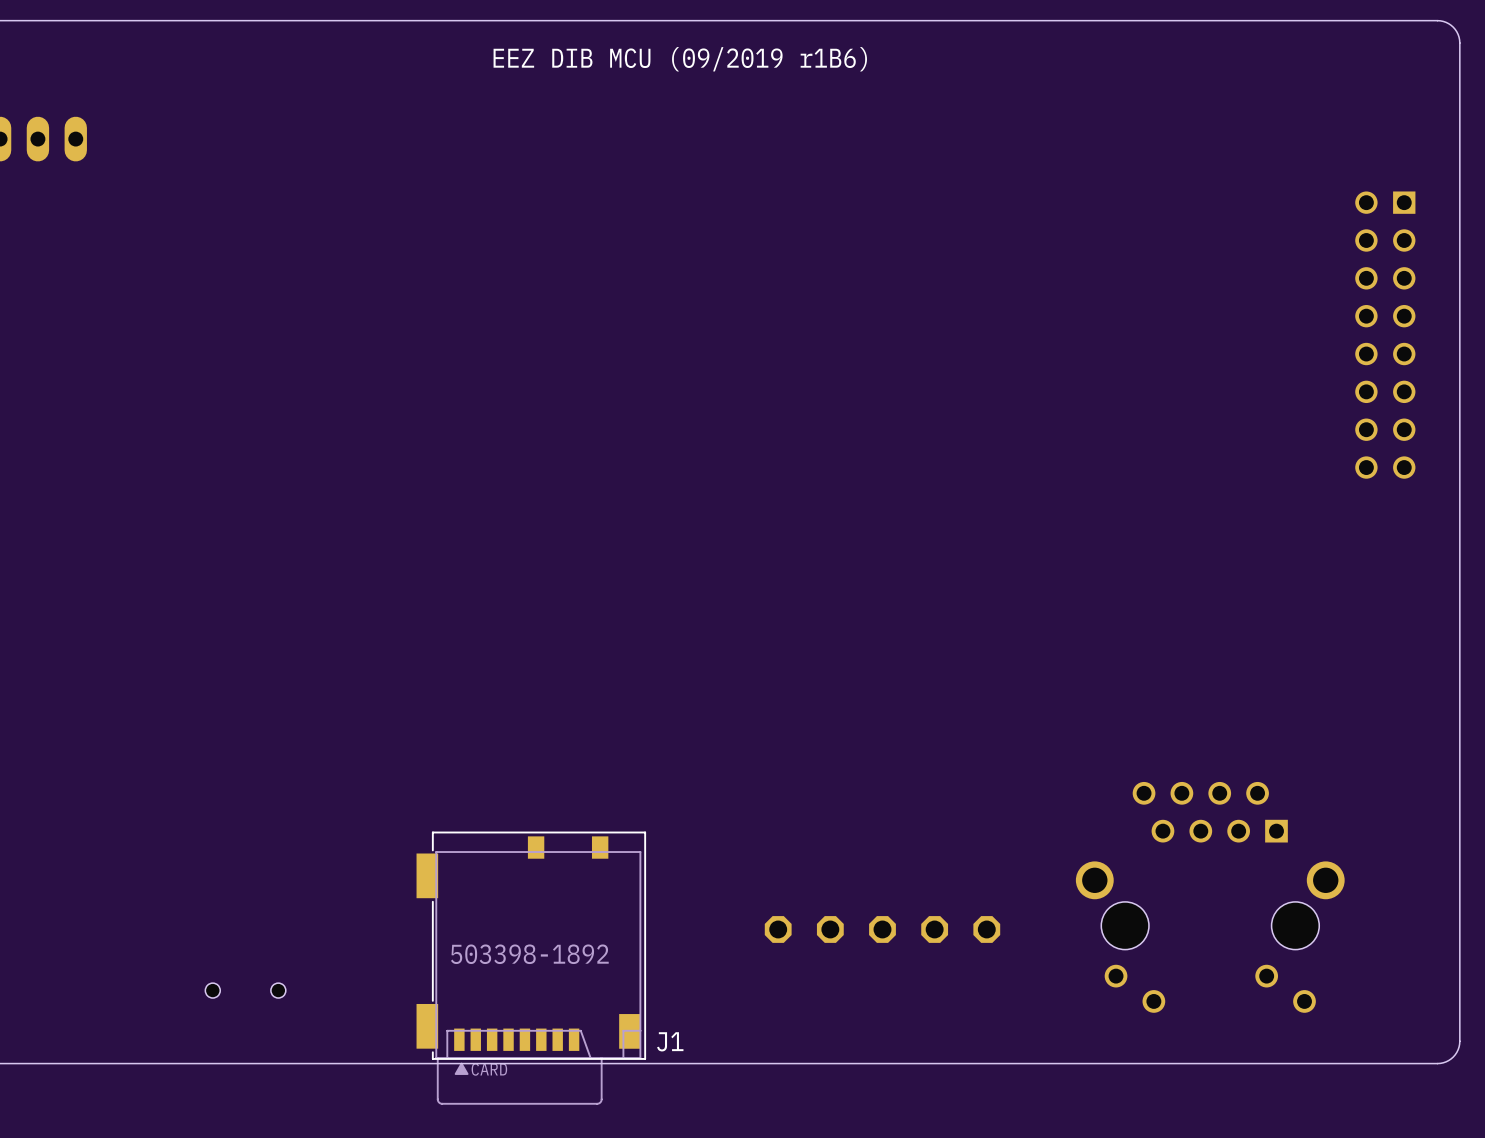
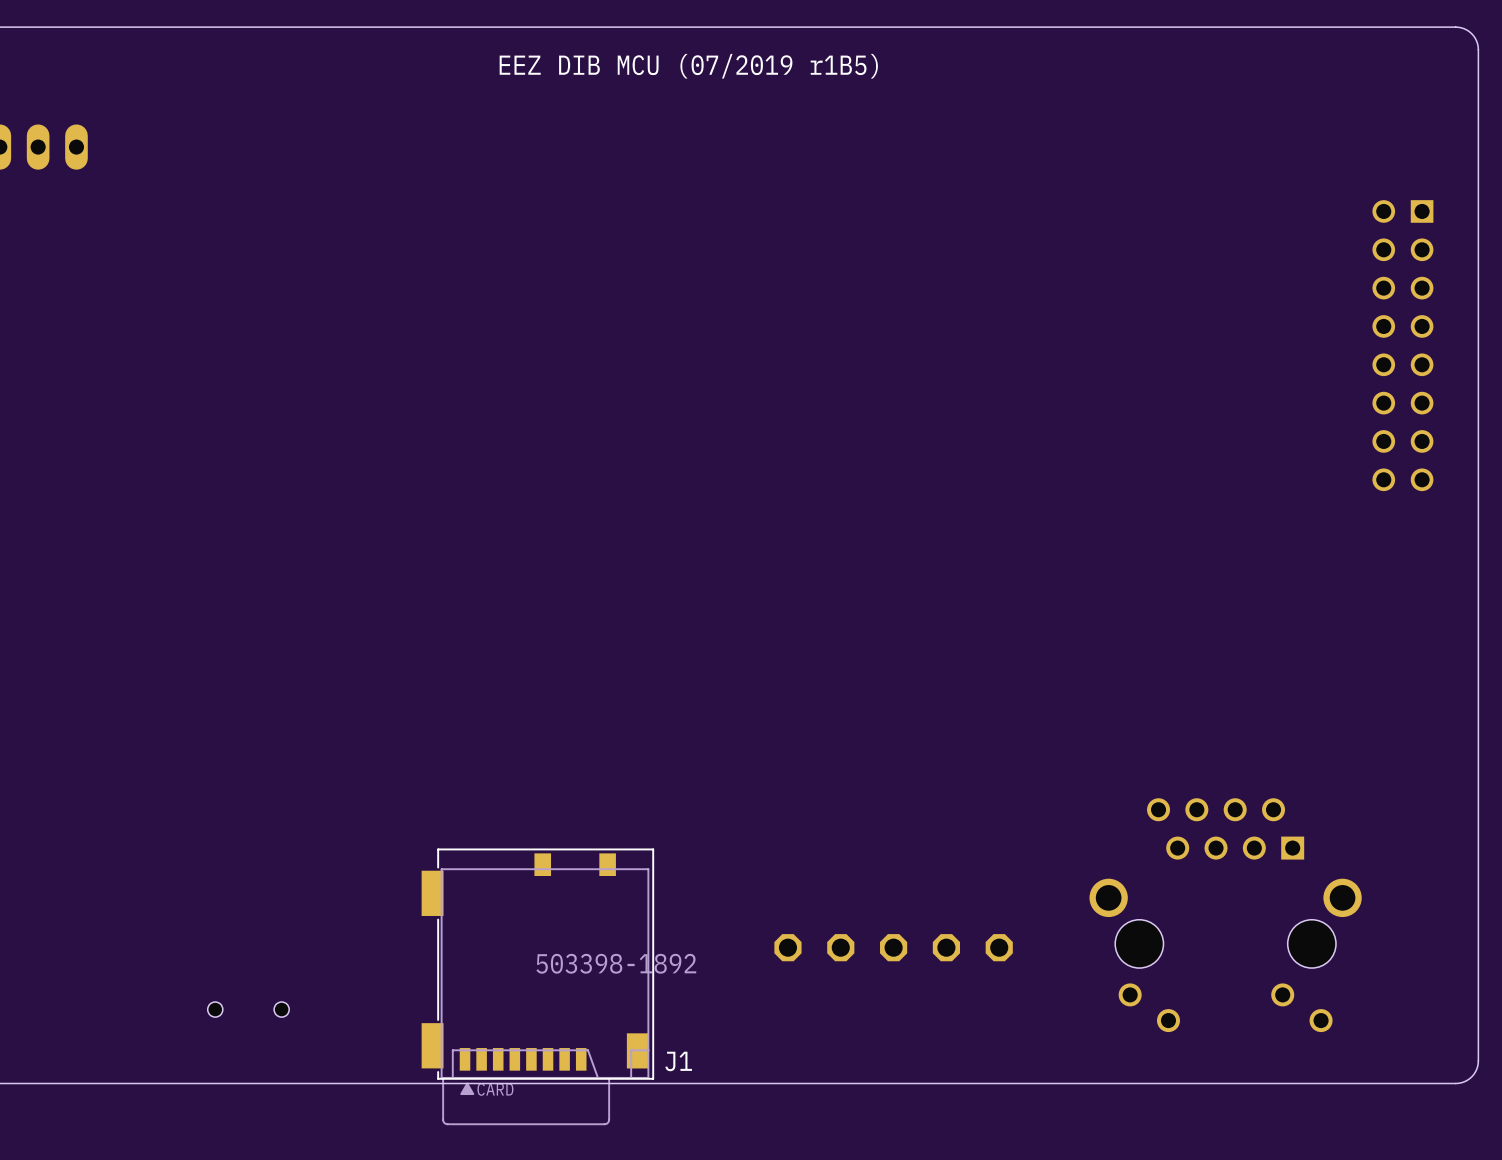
text: EEZ DIB MCU (09/2019 r1B6) (680, 59) -> EEZ DIB MCU (07/2019 r1B5) (688, 66)
J1 value position: 503398-1892 (529, 954) -> 503398-1892 (616, 963)

